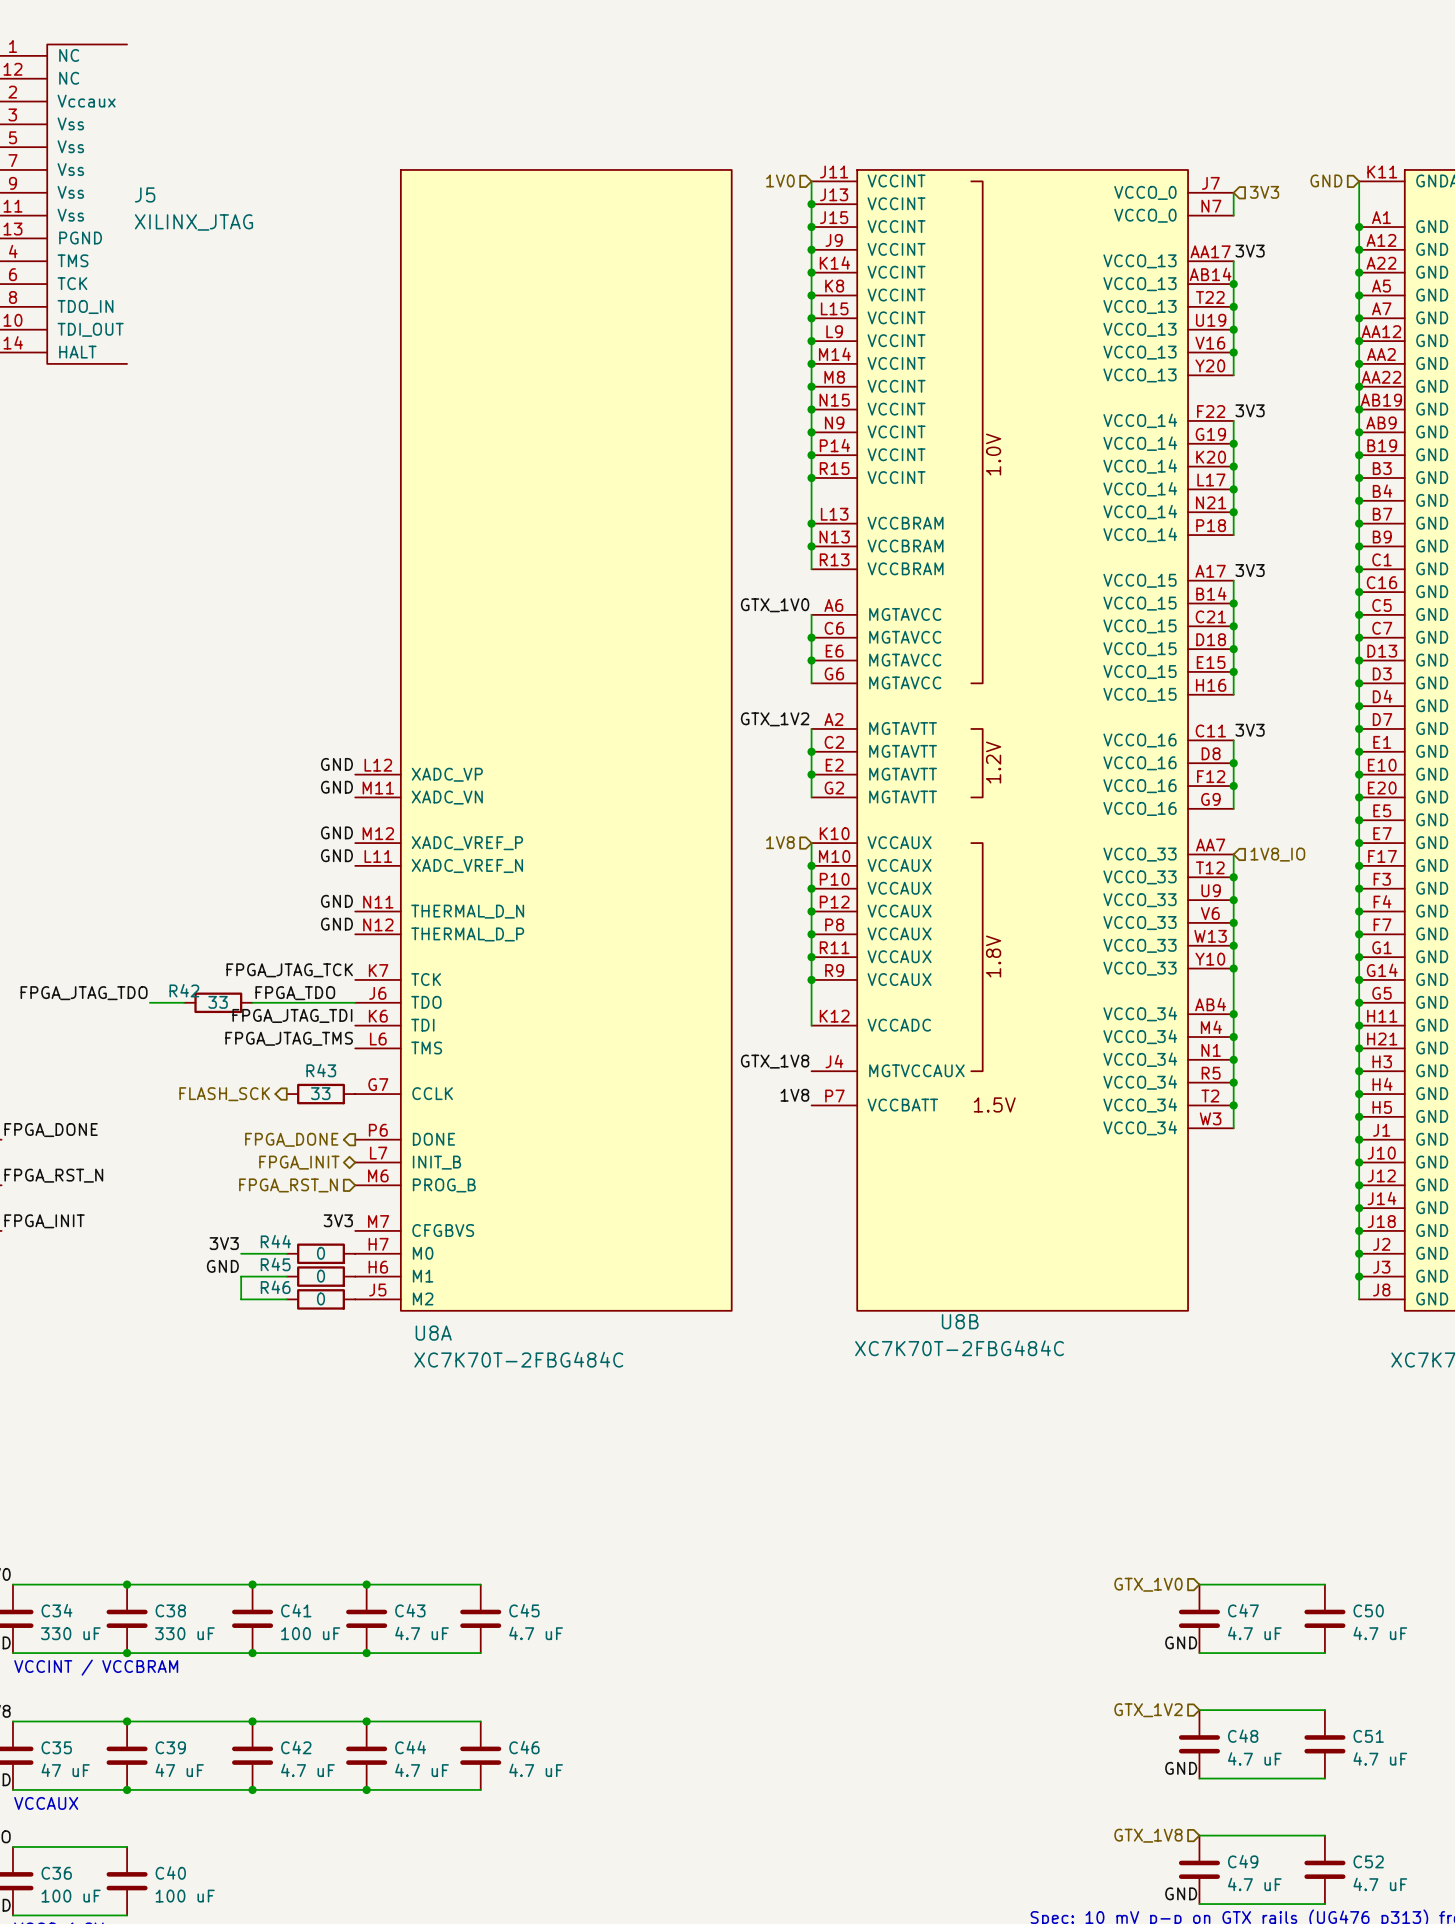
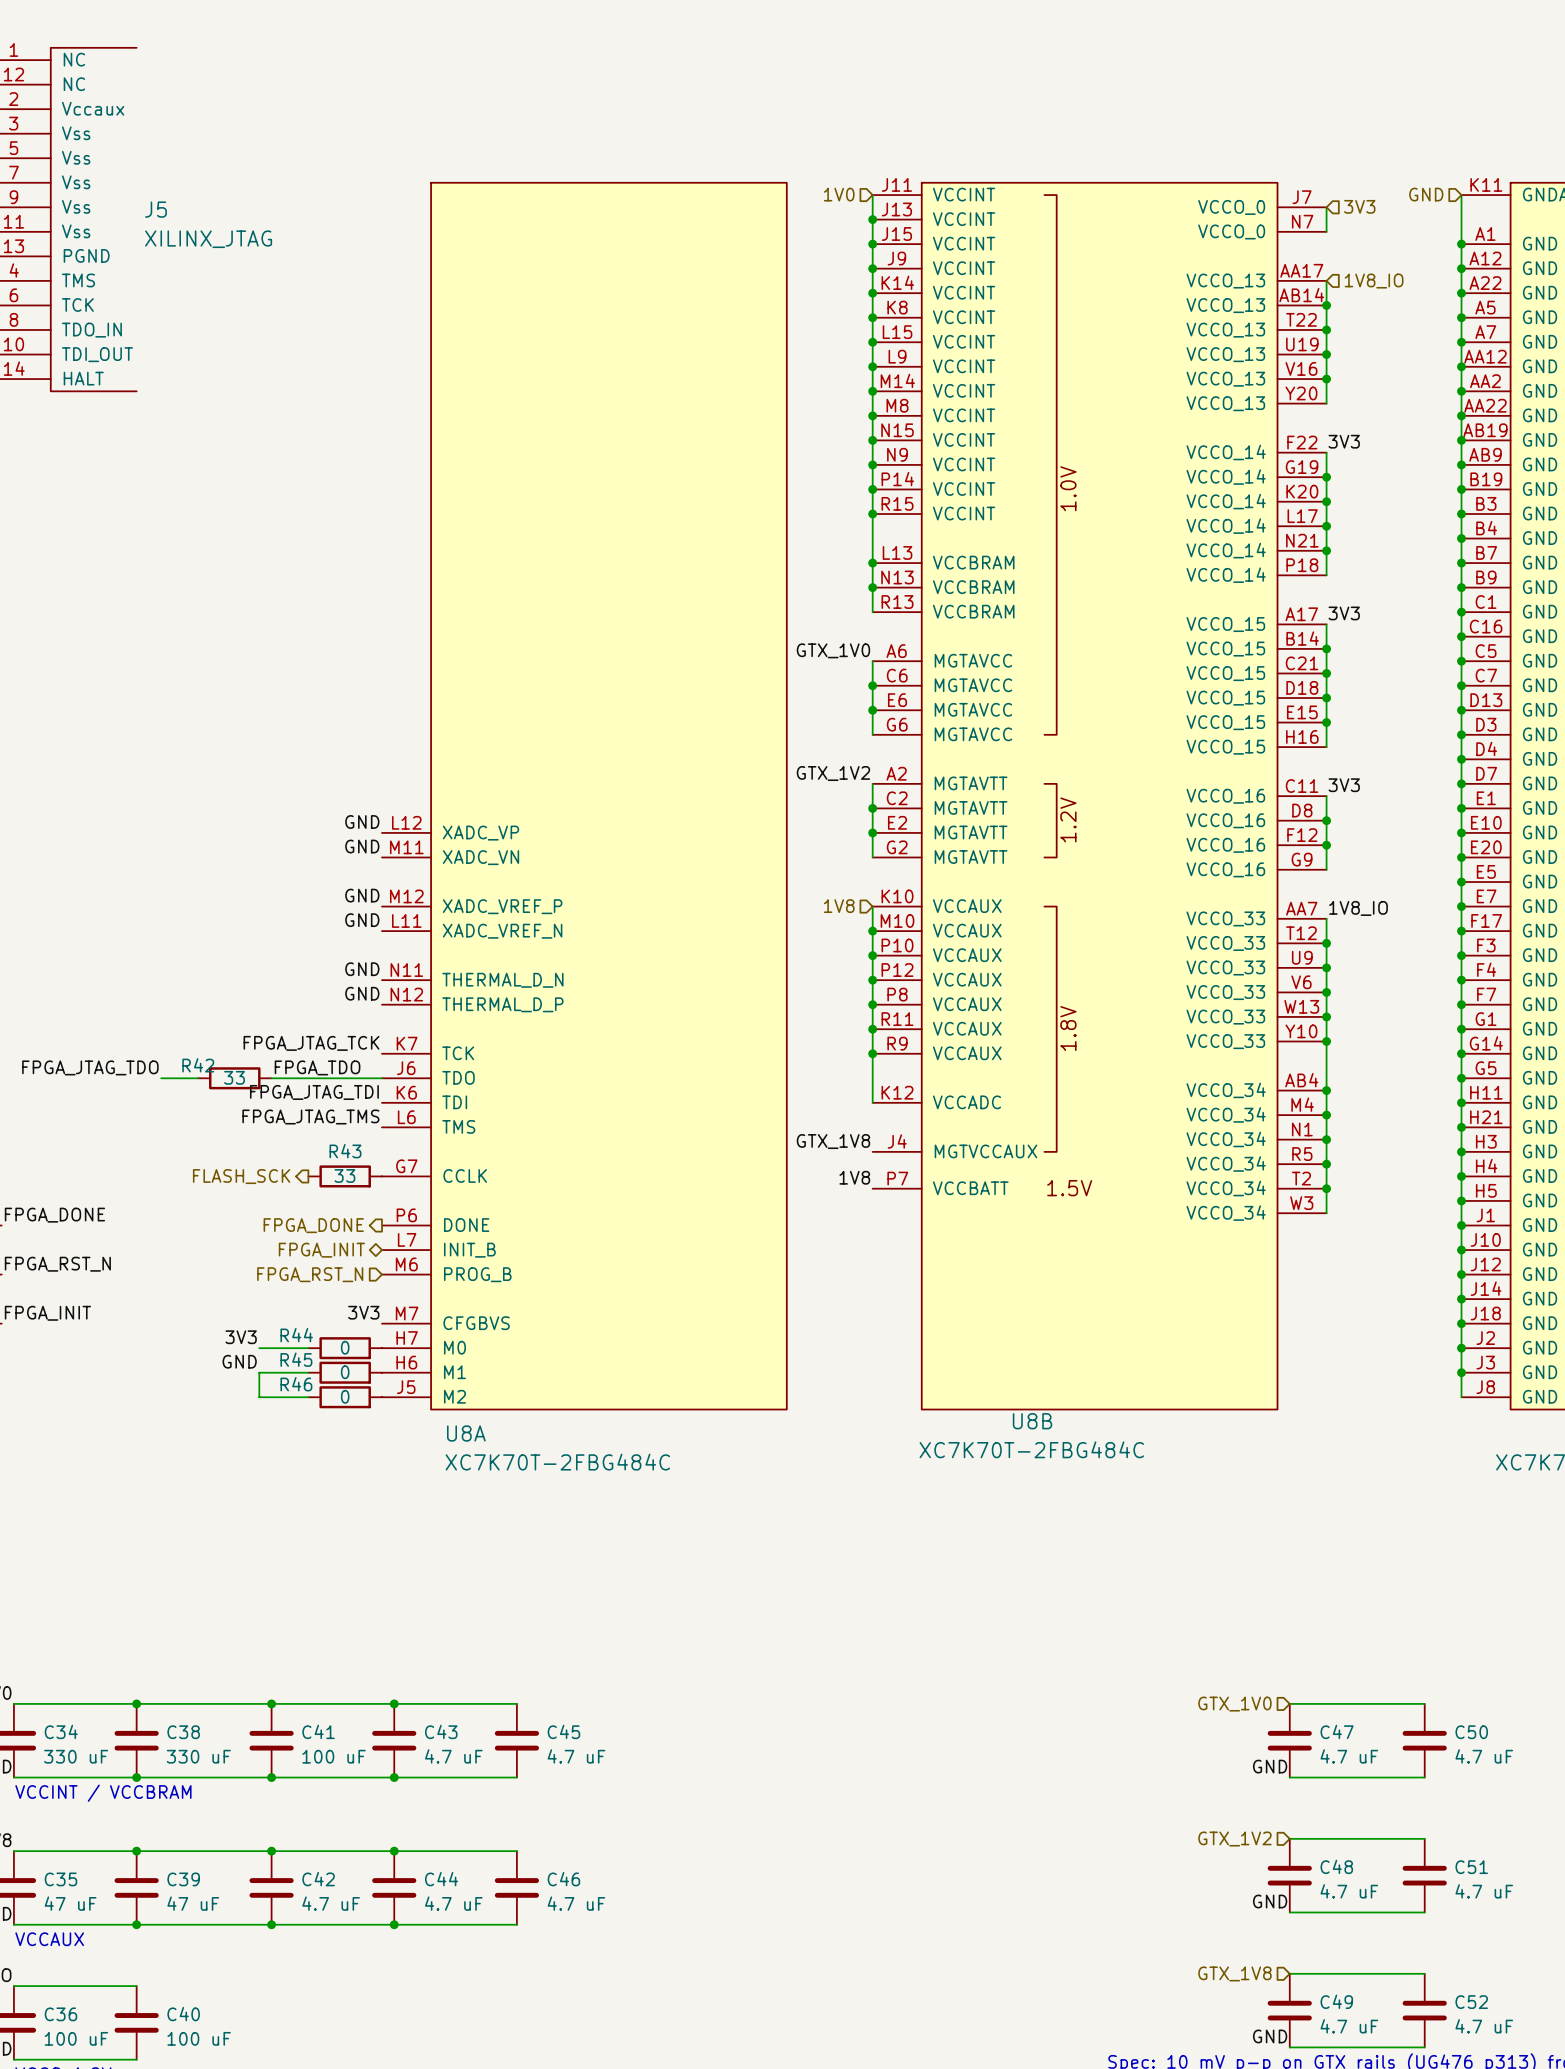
label: 3V3 (1250, 251) -> none
hierarchical label: none -> 1V8_IO (1374, 281)
label: none -> 1V8_IO (1358, 908)
hierarchical label: 1V8_IO (1277, 854) -> none

